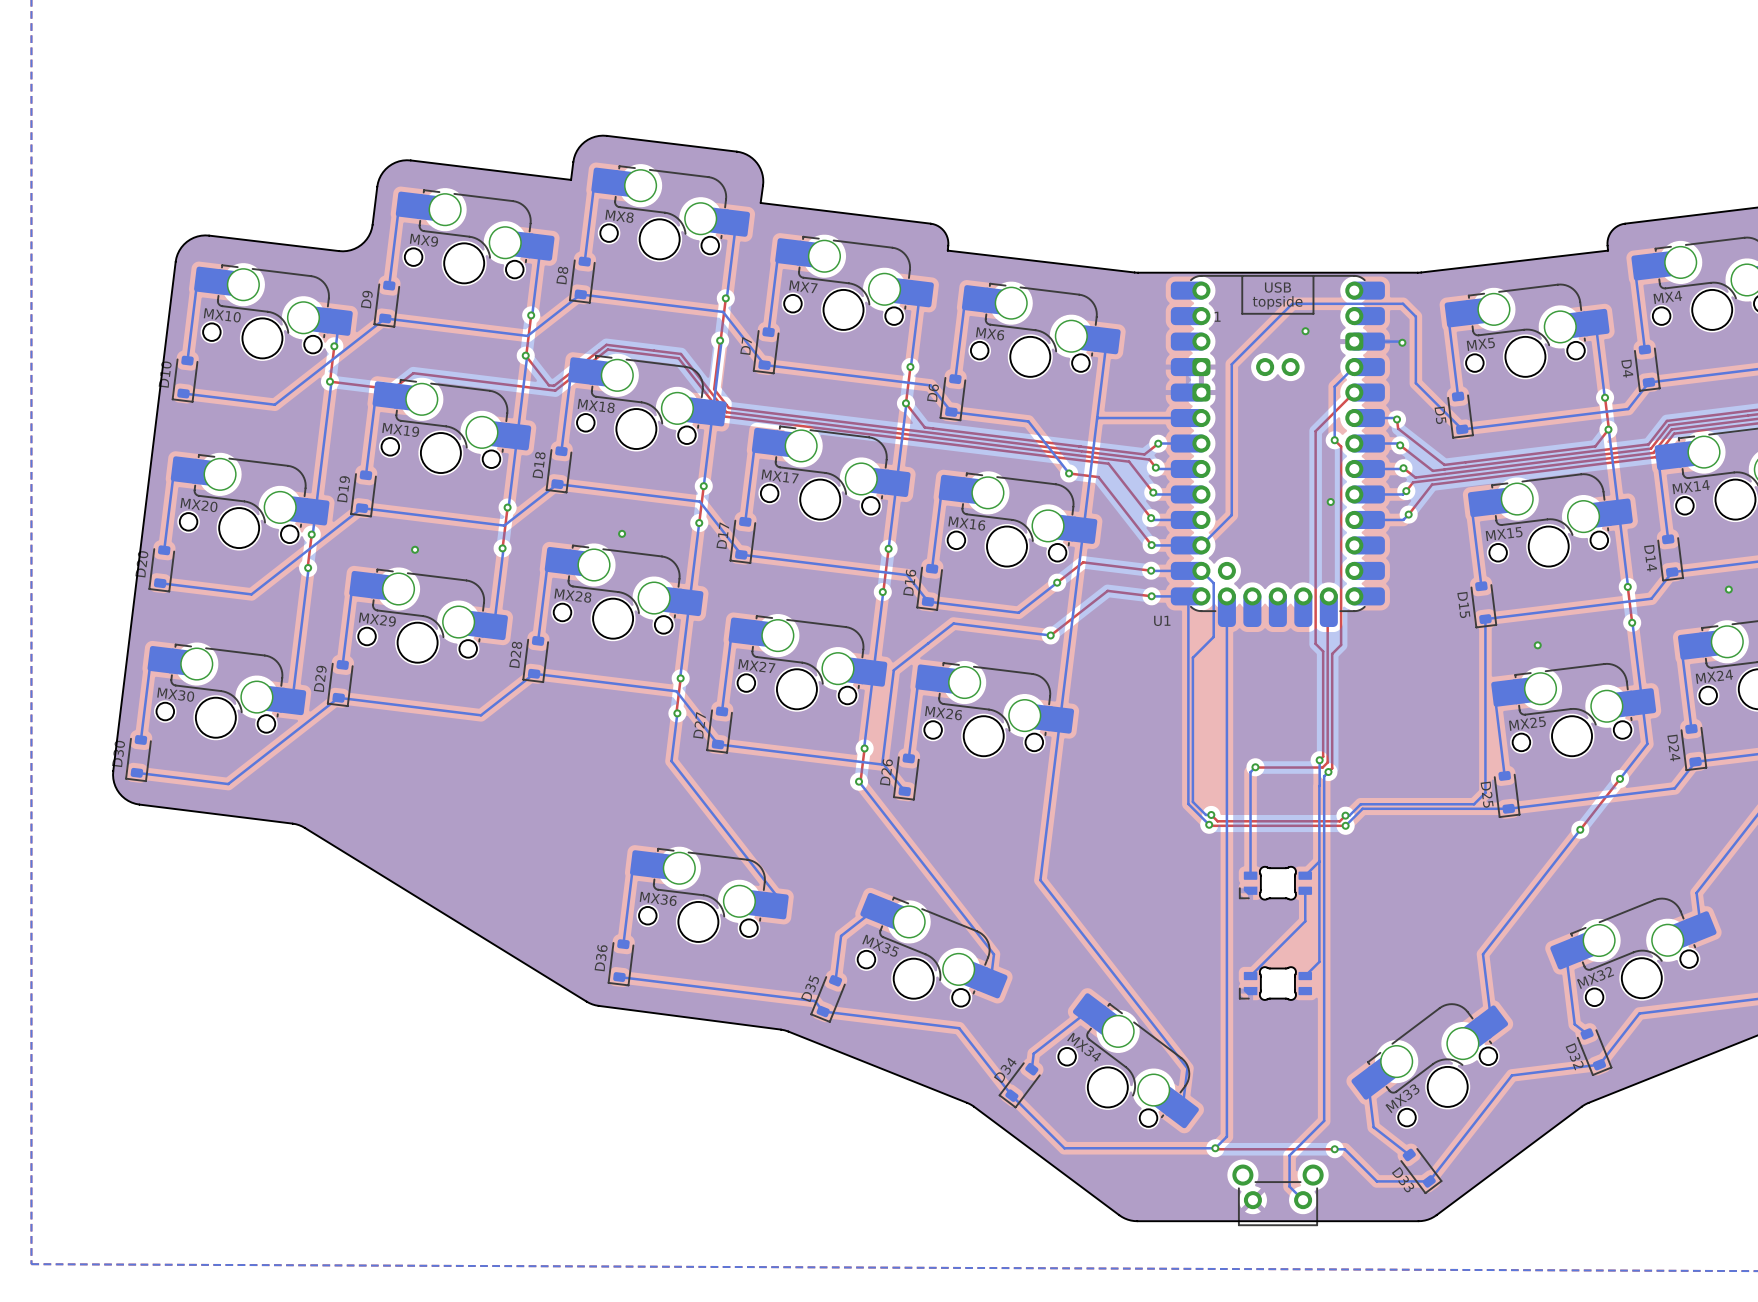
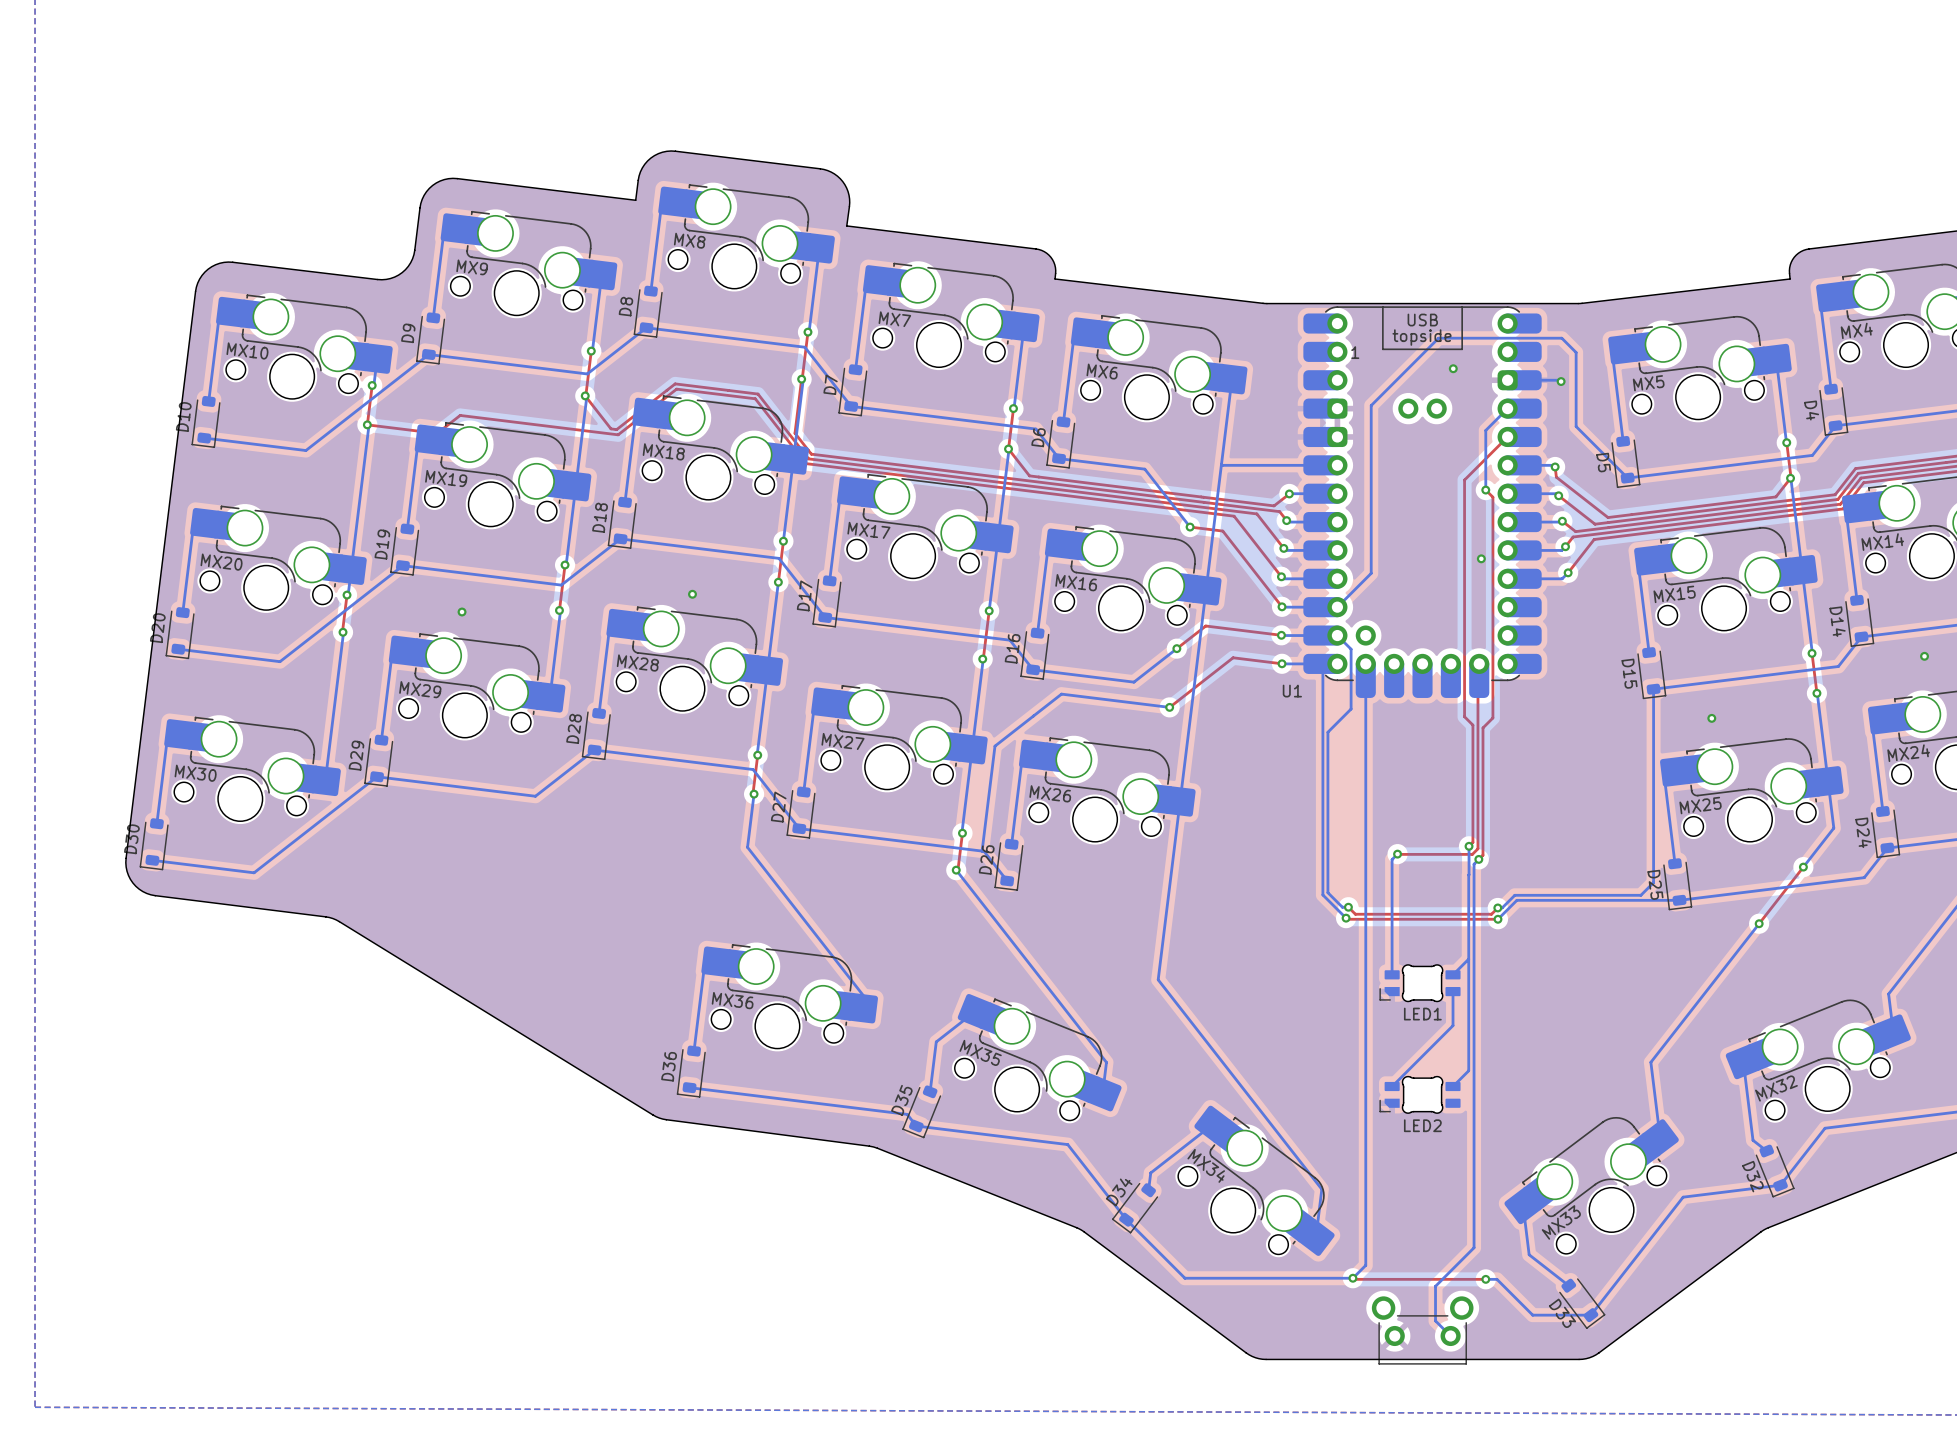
LED1 name: none -> LED1 (1422, 1014)
LED2 name: none -> LED2 (1422, 1125)

